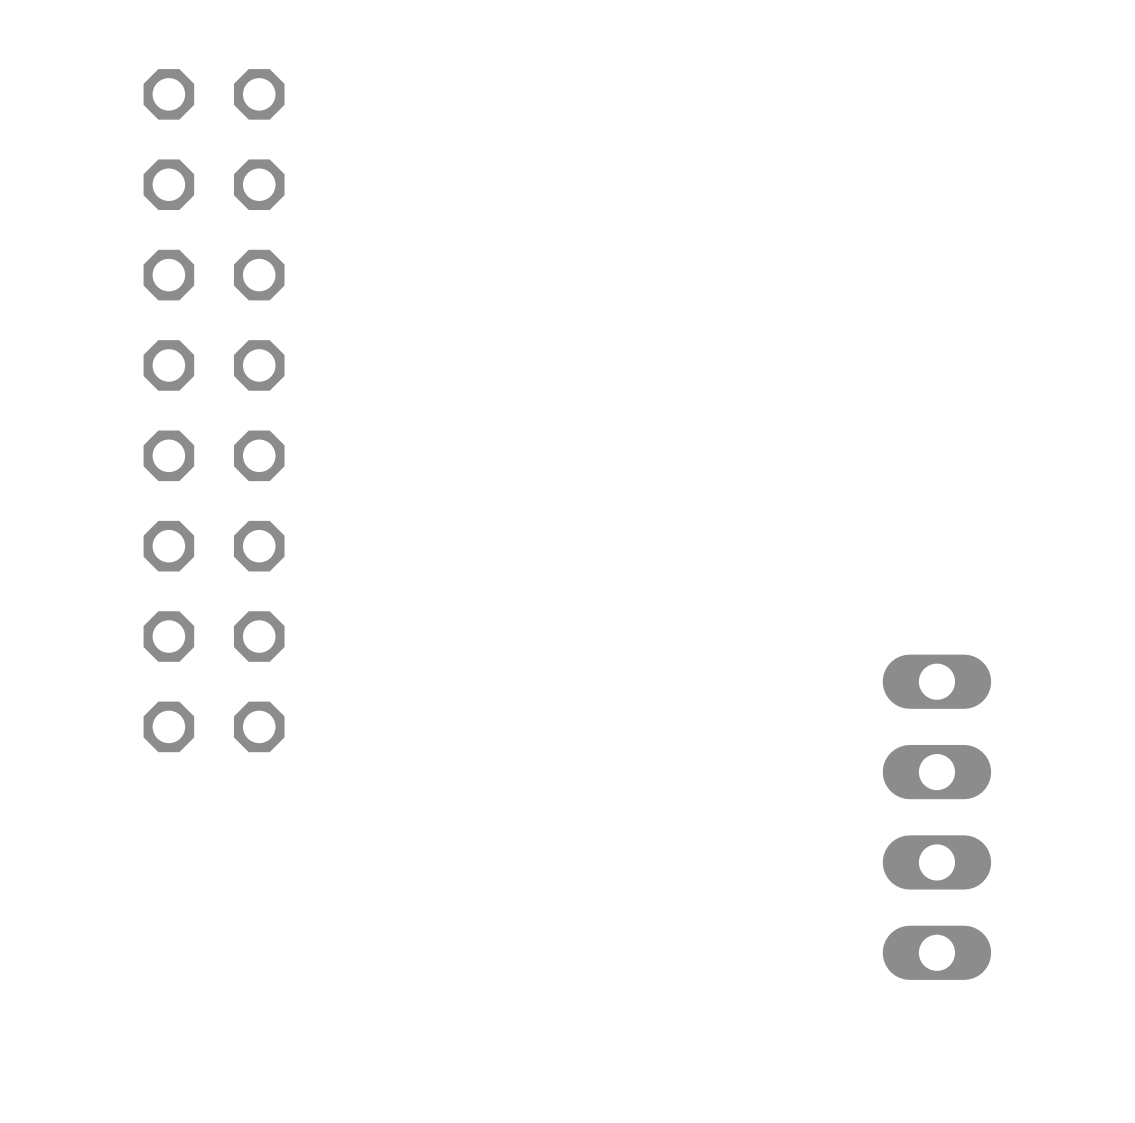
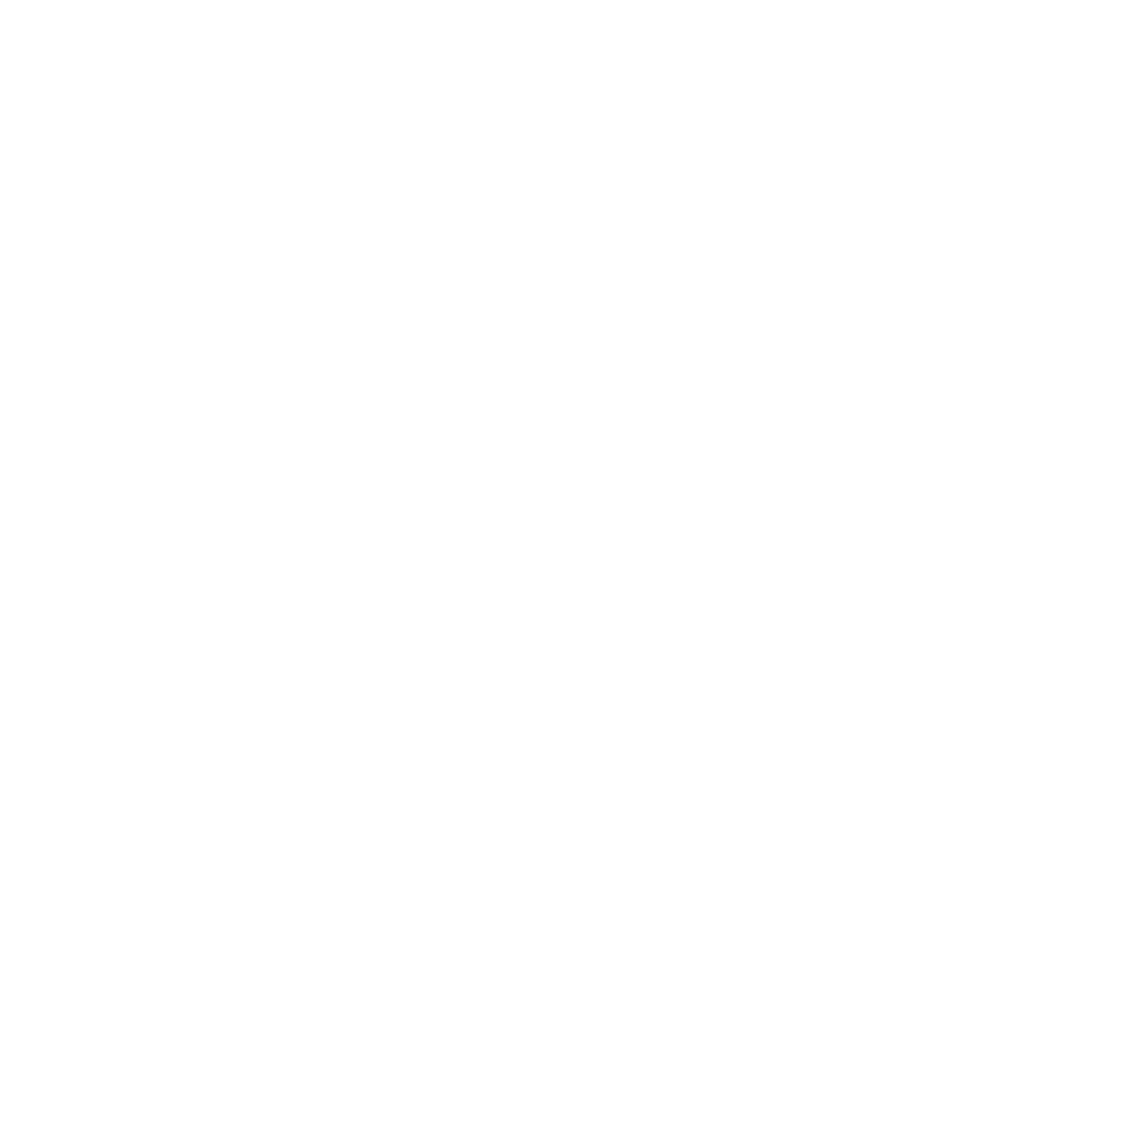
part: (214, 410) -> none
part: (936, 817) -> none

